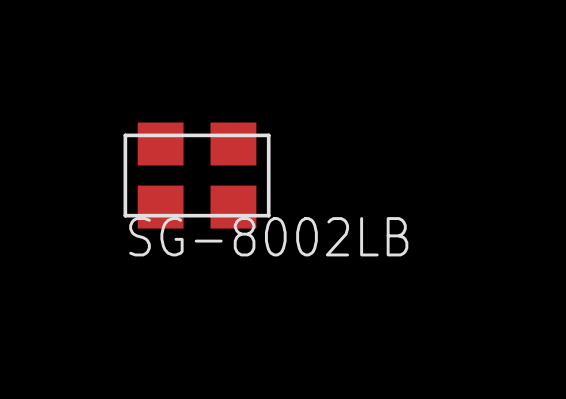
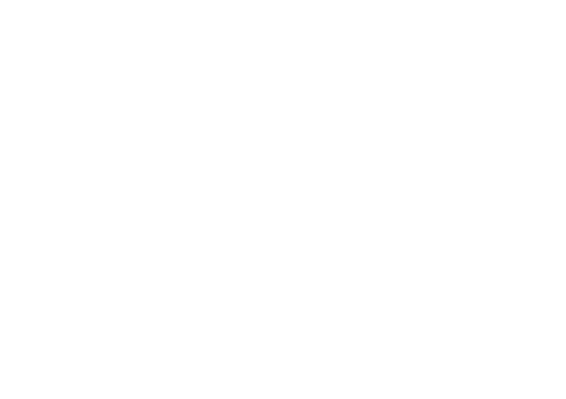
part: (197, 175) -> none

